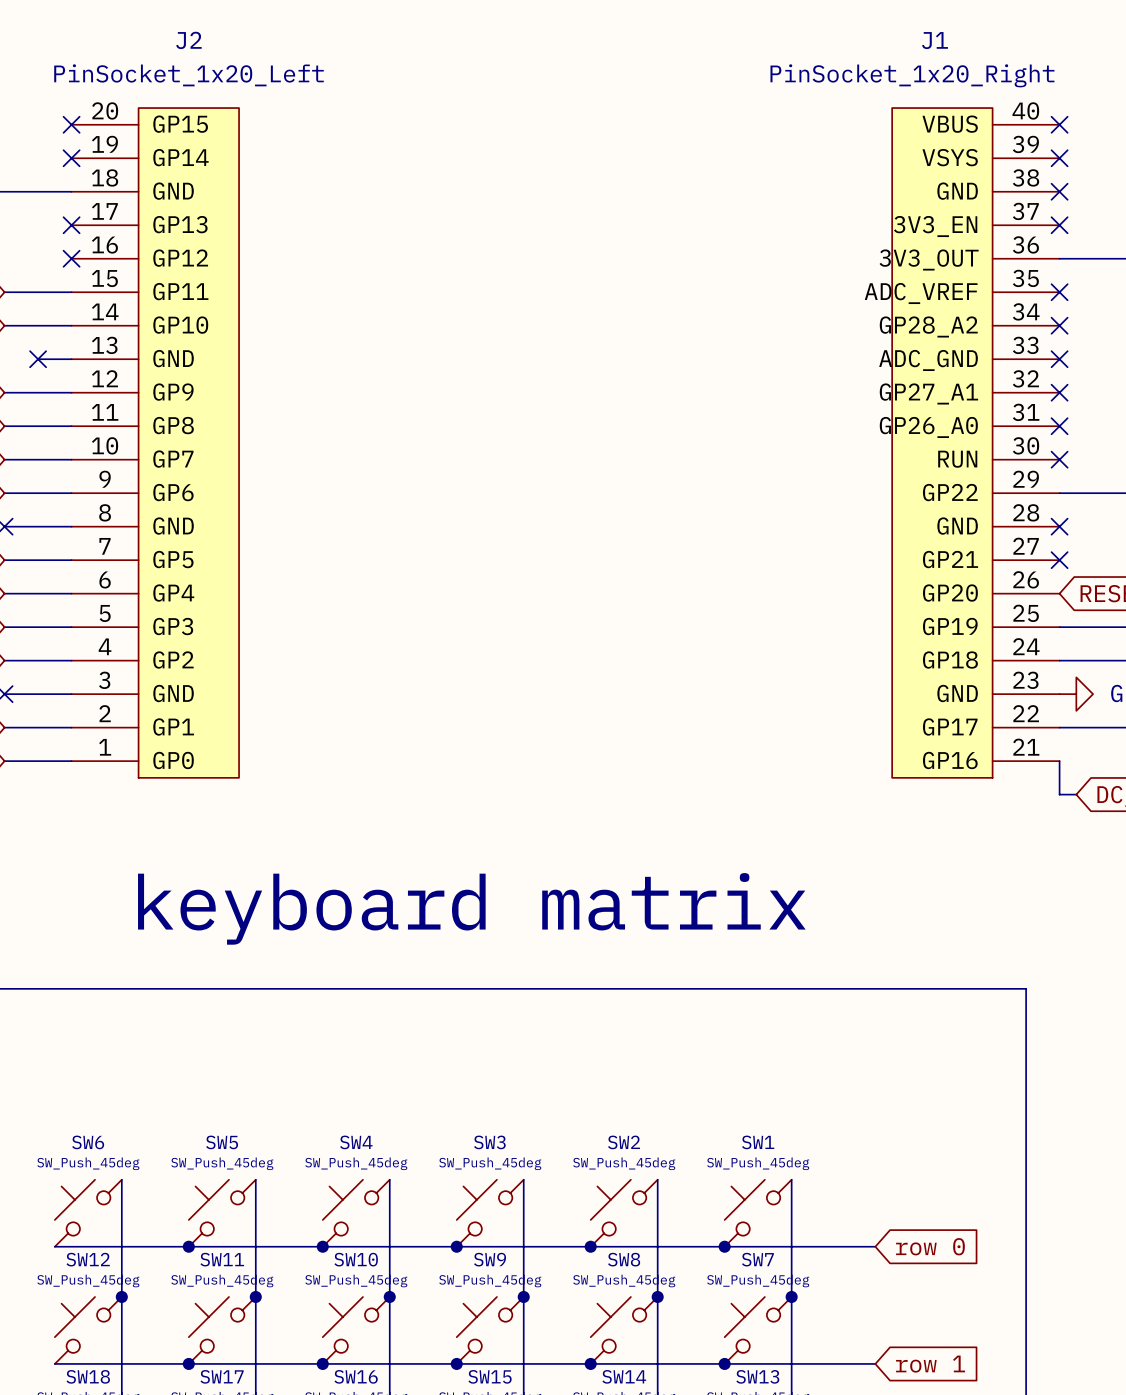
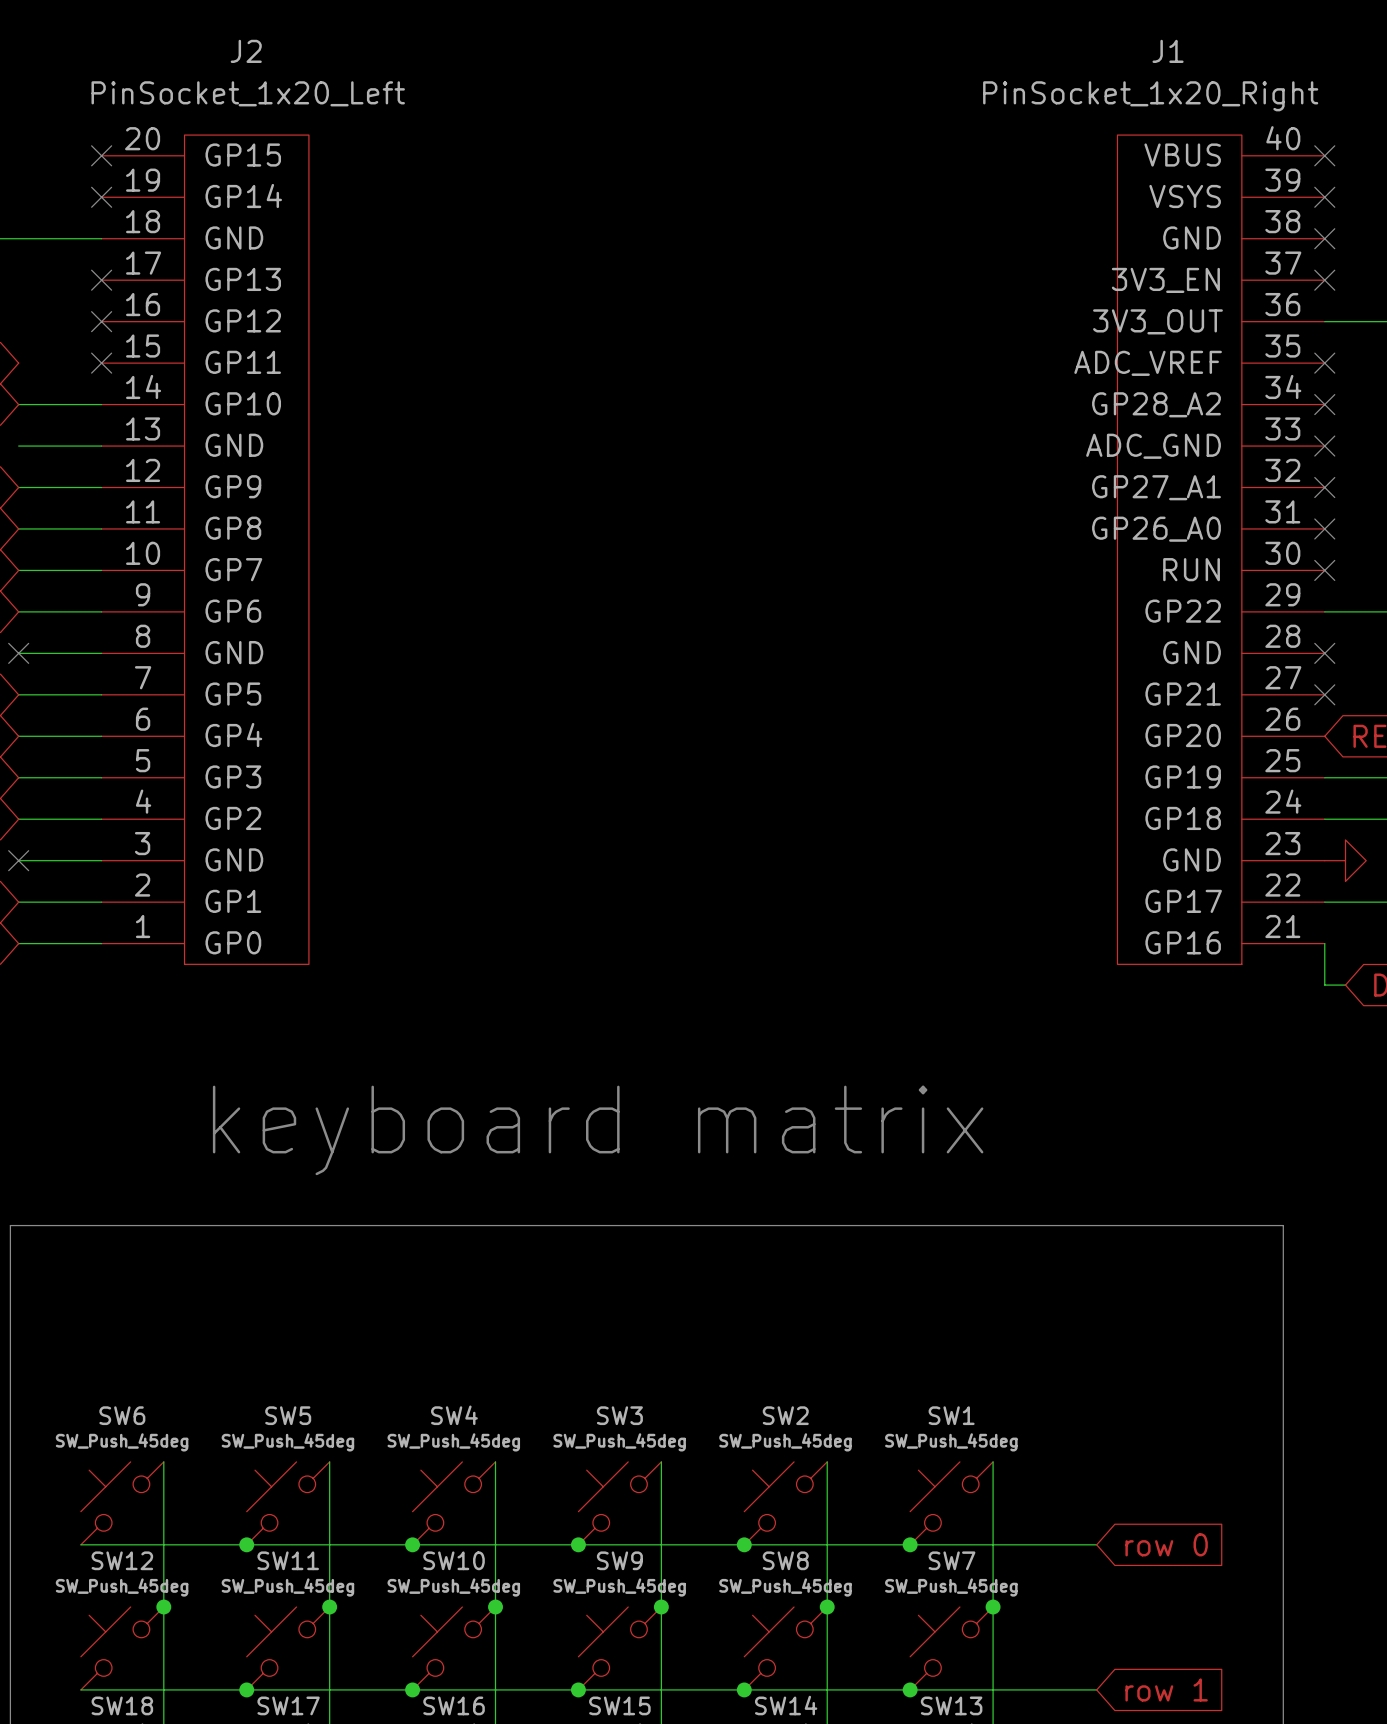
wire: (4, 292) (71, 292) -> none
wire: none -> (18, 446) (60, 446)
no-connect mark position: (38, 359) -> (101, 363)

